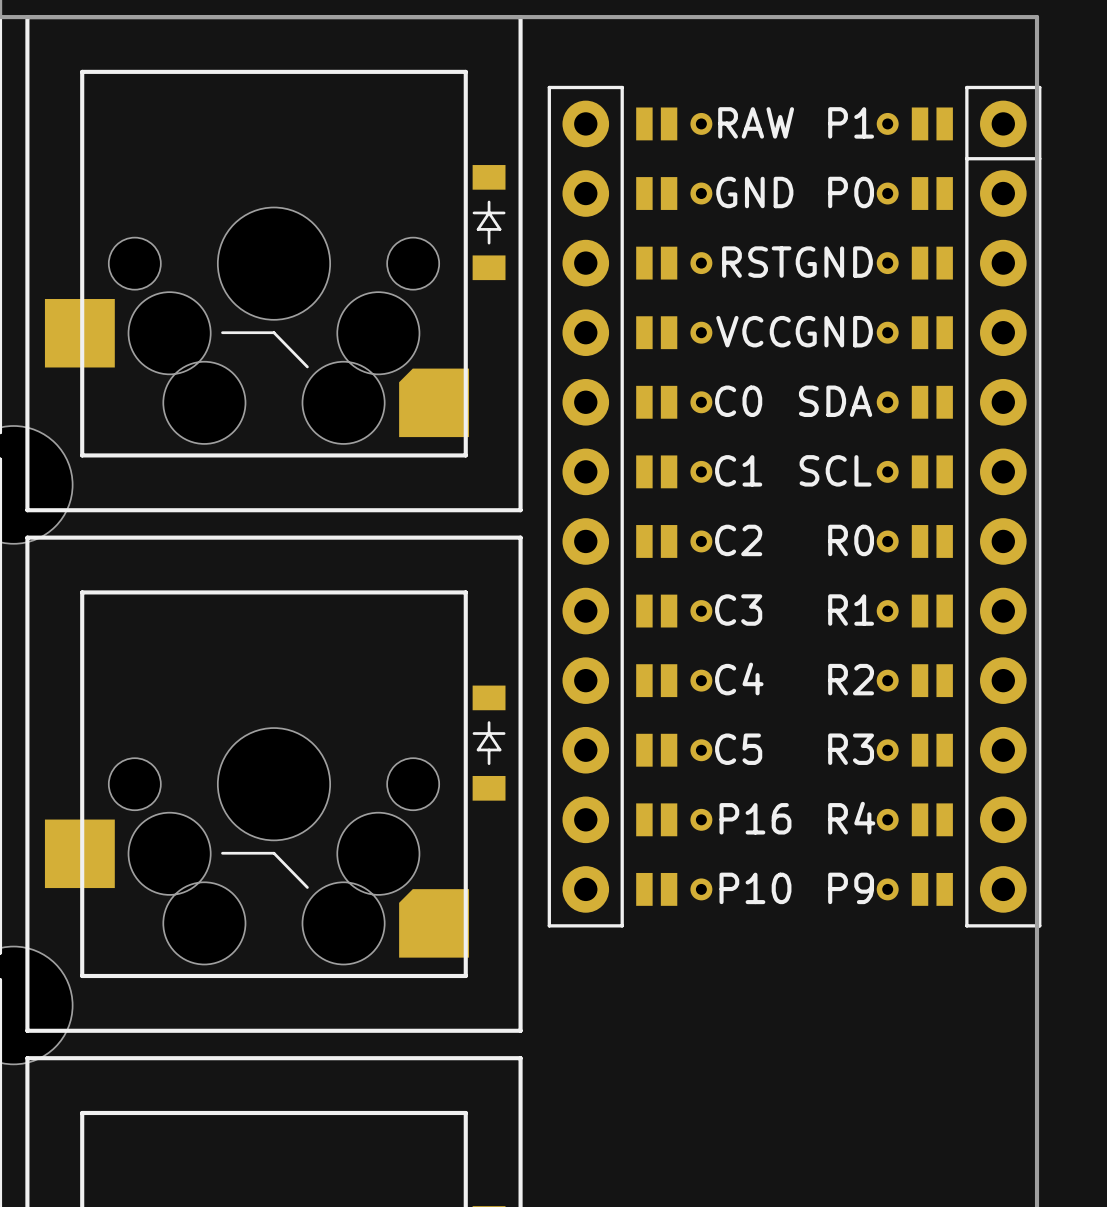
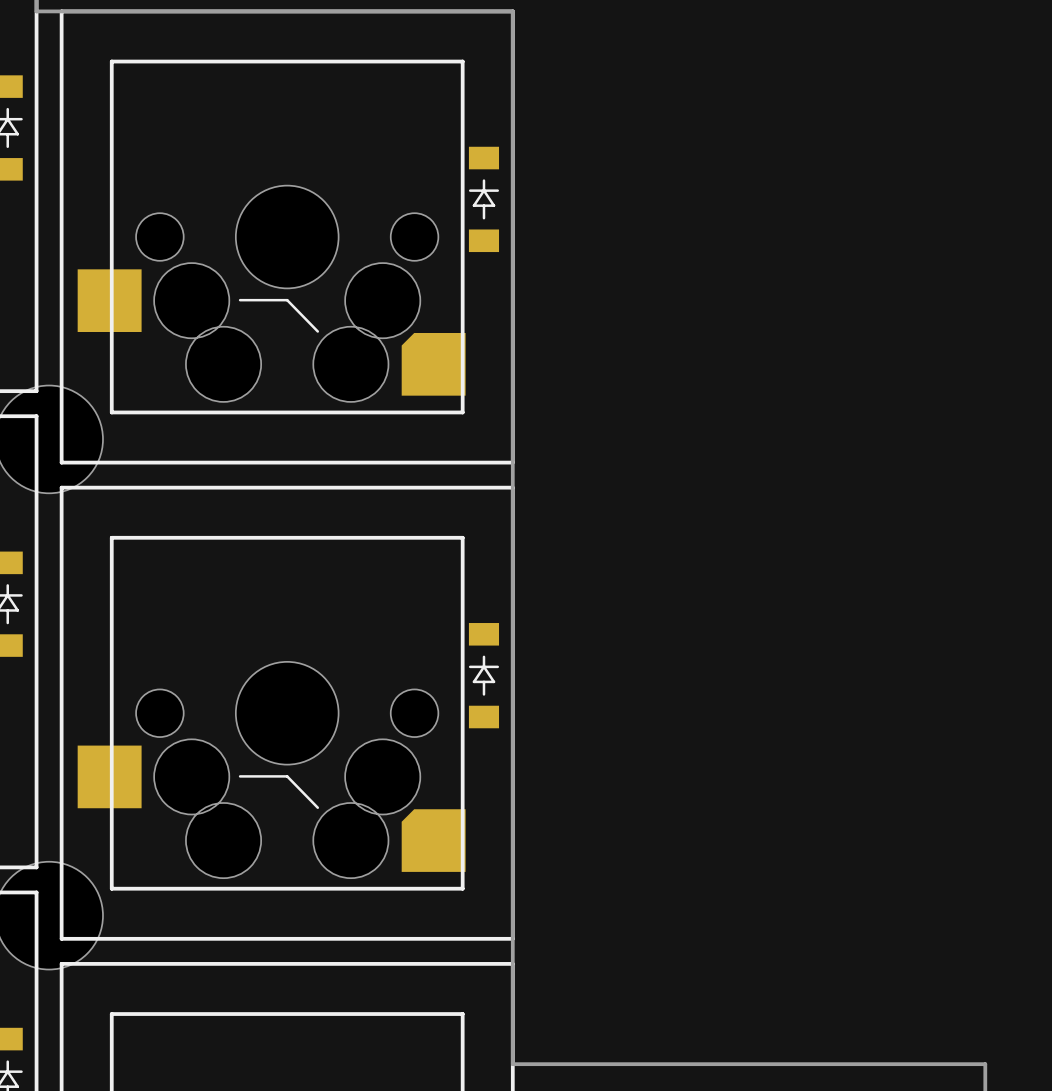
board edge: (520, 17) (1037, 17) (1037, 1167) -> (512, 11) (512, 1064) (985, 1064)
part: (794, 506) -> none

